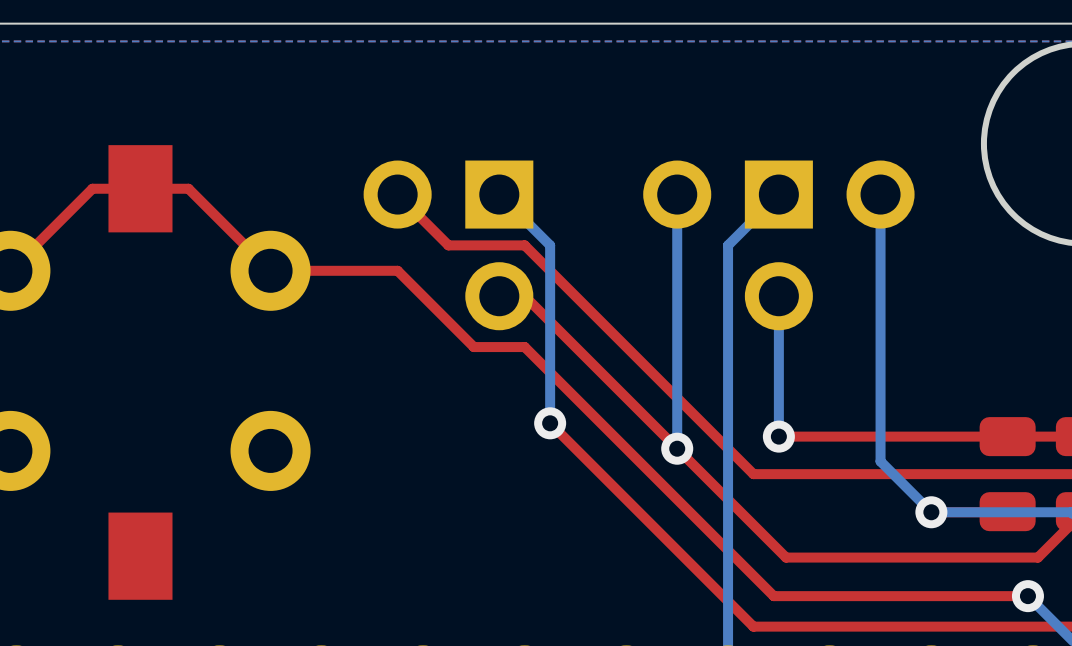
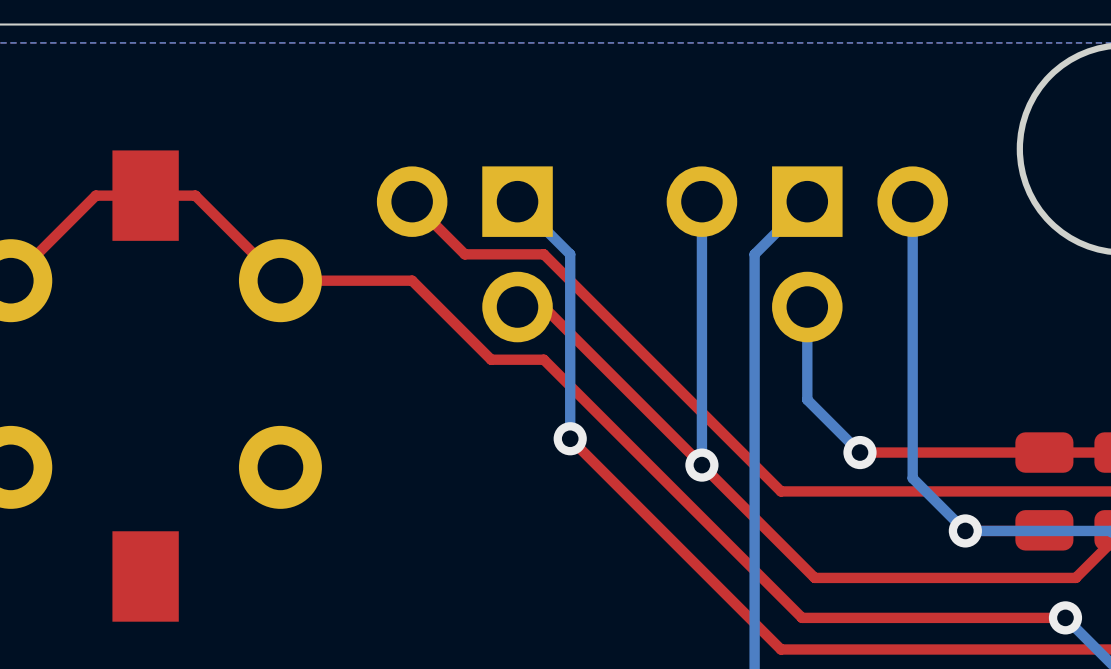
bottom track: (778, 385) (778, 436) -> (807, 399) (859, 452)
via position: (778, 436) -> (859, 452)
top track: (829, 436) (778, 436) -> none

